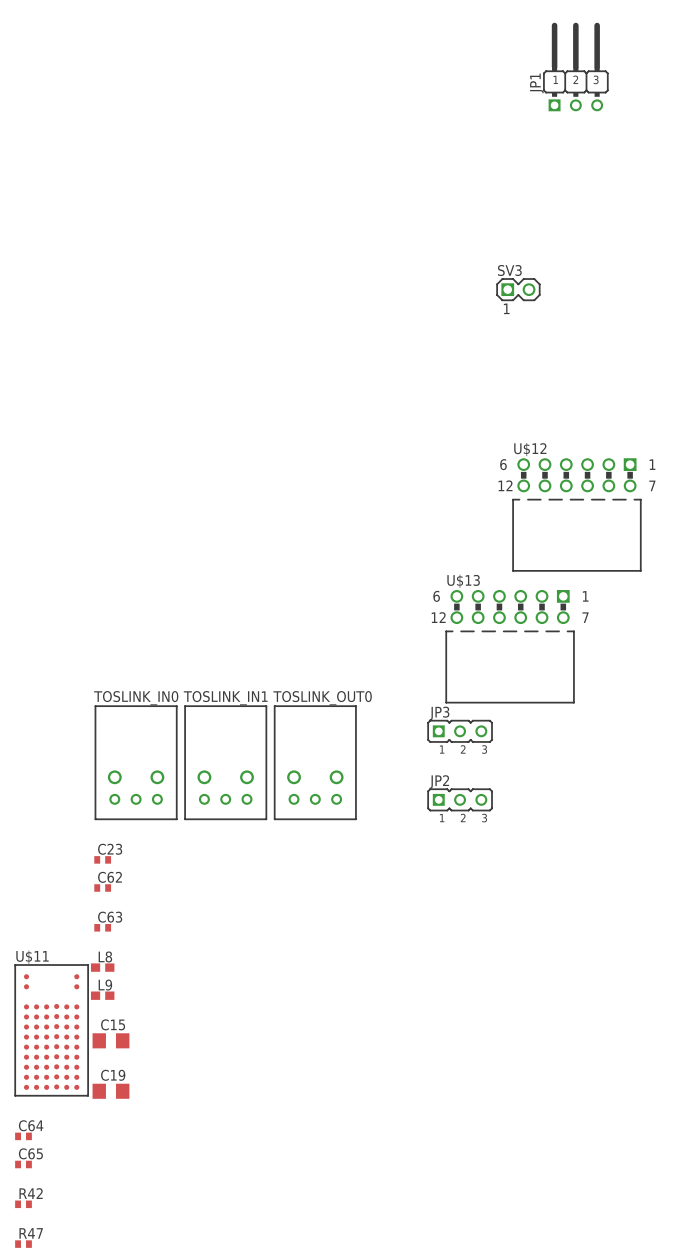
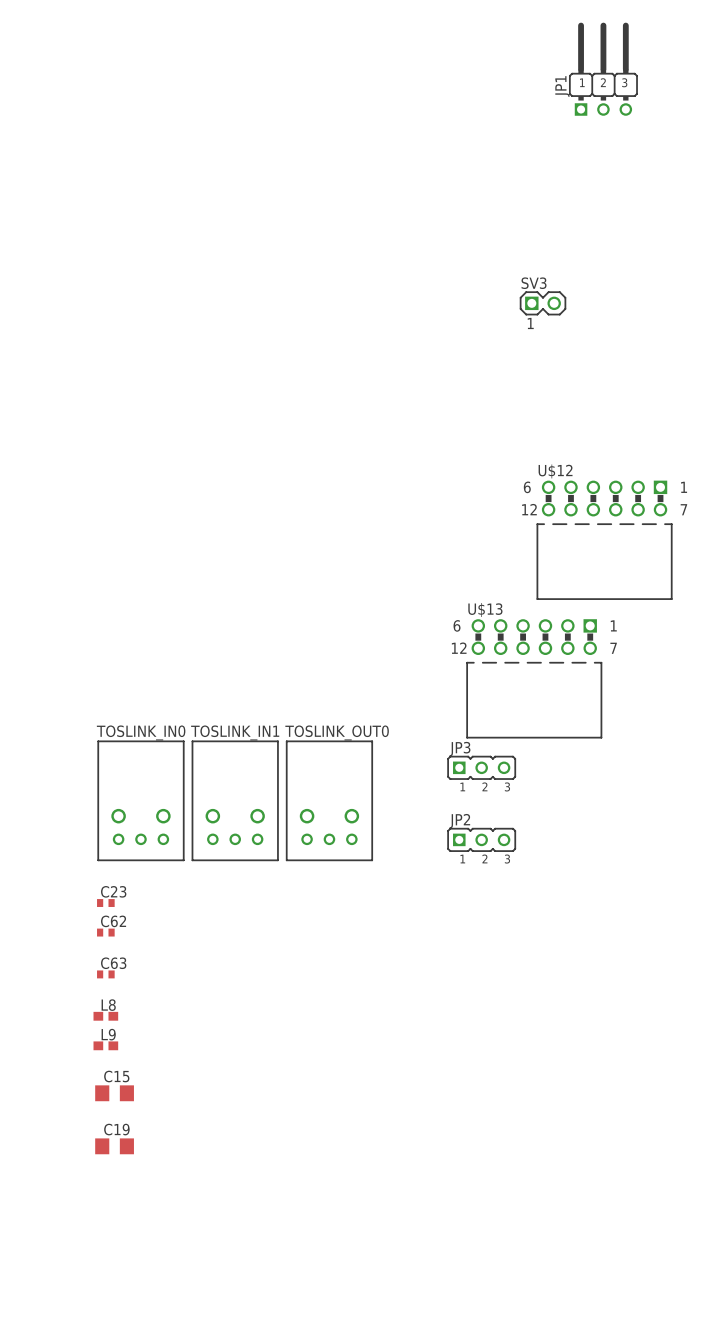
U$11: (51, 1030) -> none
C64: (23, 1136) -> none
C65: (23, 1164) -> none
R42: (23, 1204) -> none
R47: (23, 1244) -> none

